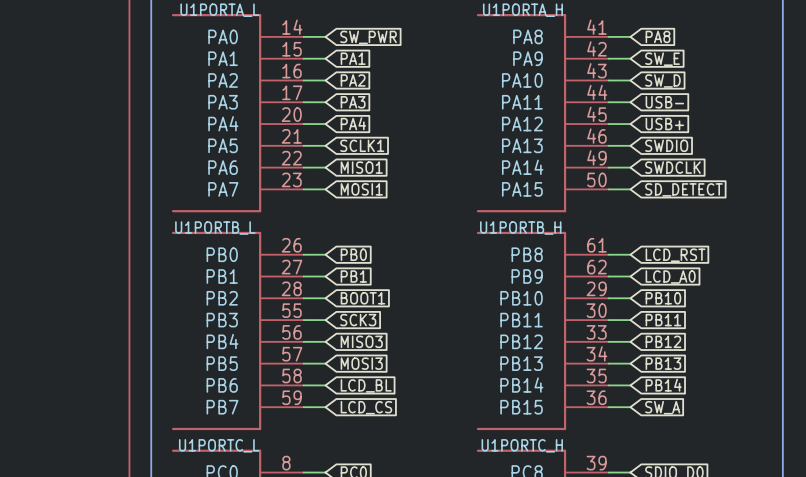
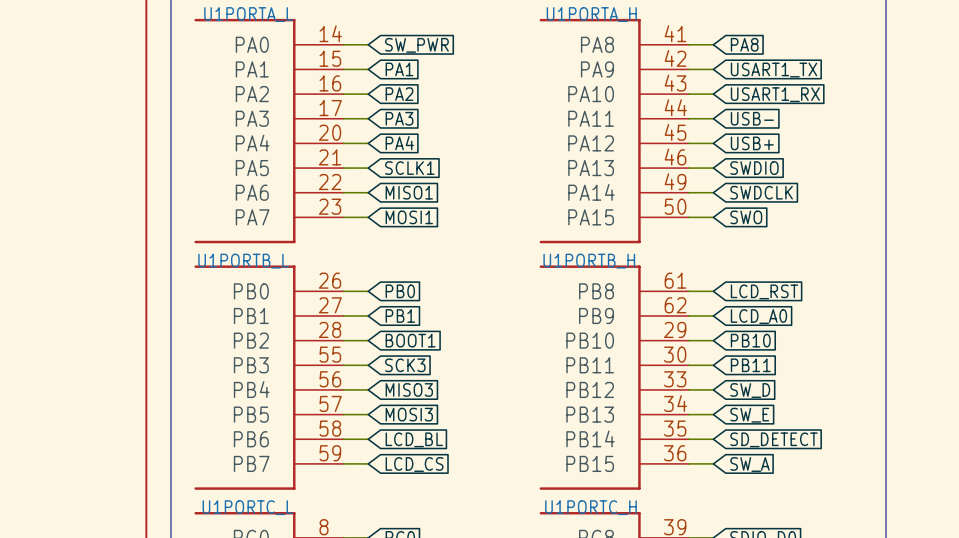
global label: SW_E (662, 59) -> USART1_TX (774, 70)
global label: SW_D (662, 81) -> USART1_RX (775, 94)
global label: SD_DETECT (683, 189) -> SWO (746, 217)
global label: PB12 (663, 341) -> SW_D (750, 390)
global label: PB13 (663, 363) -> SW_E (749, 415)
global label: PB14 (663, 385) -> SD_DETECT (774, 439)

